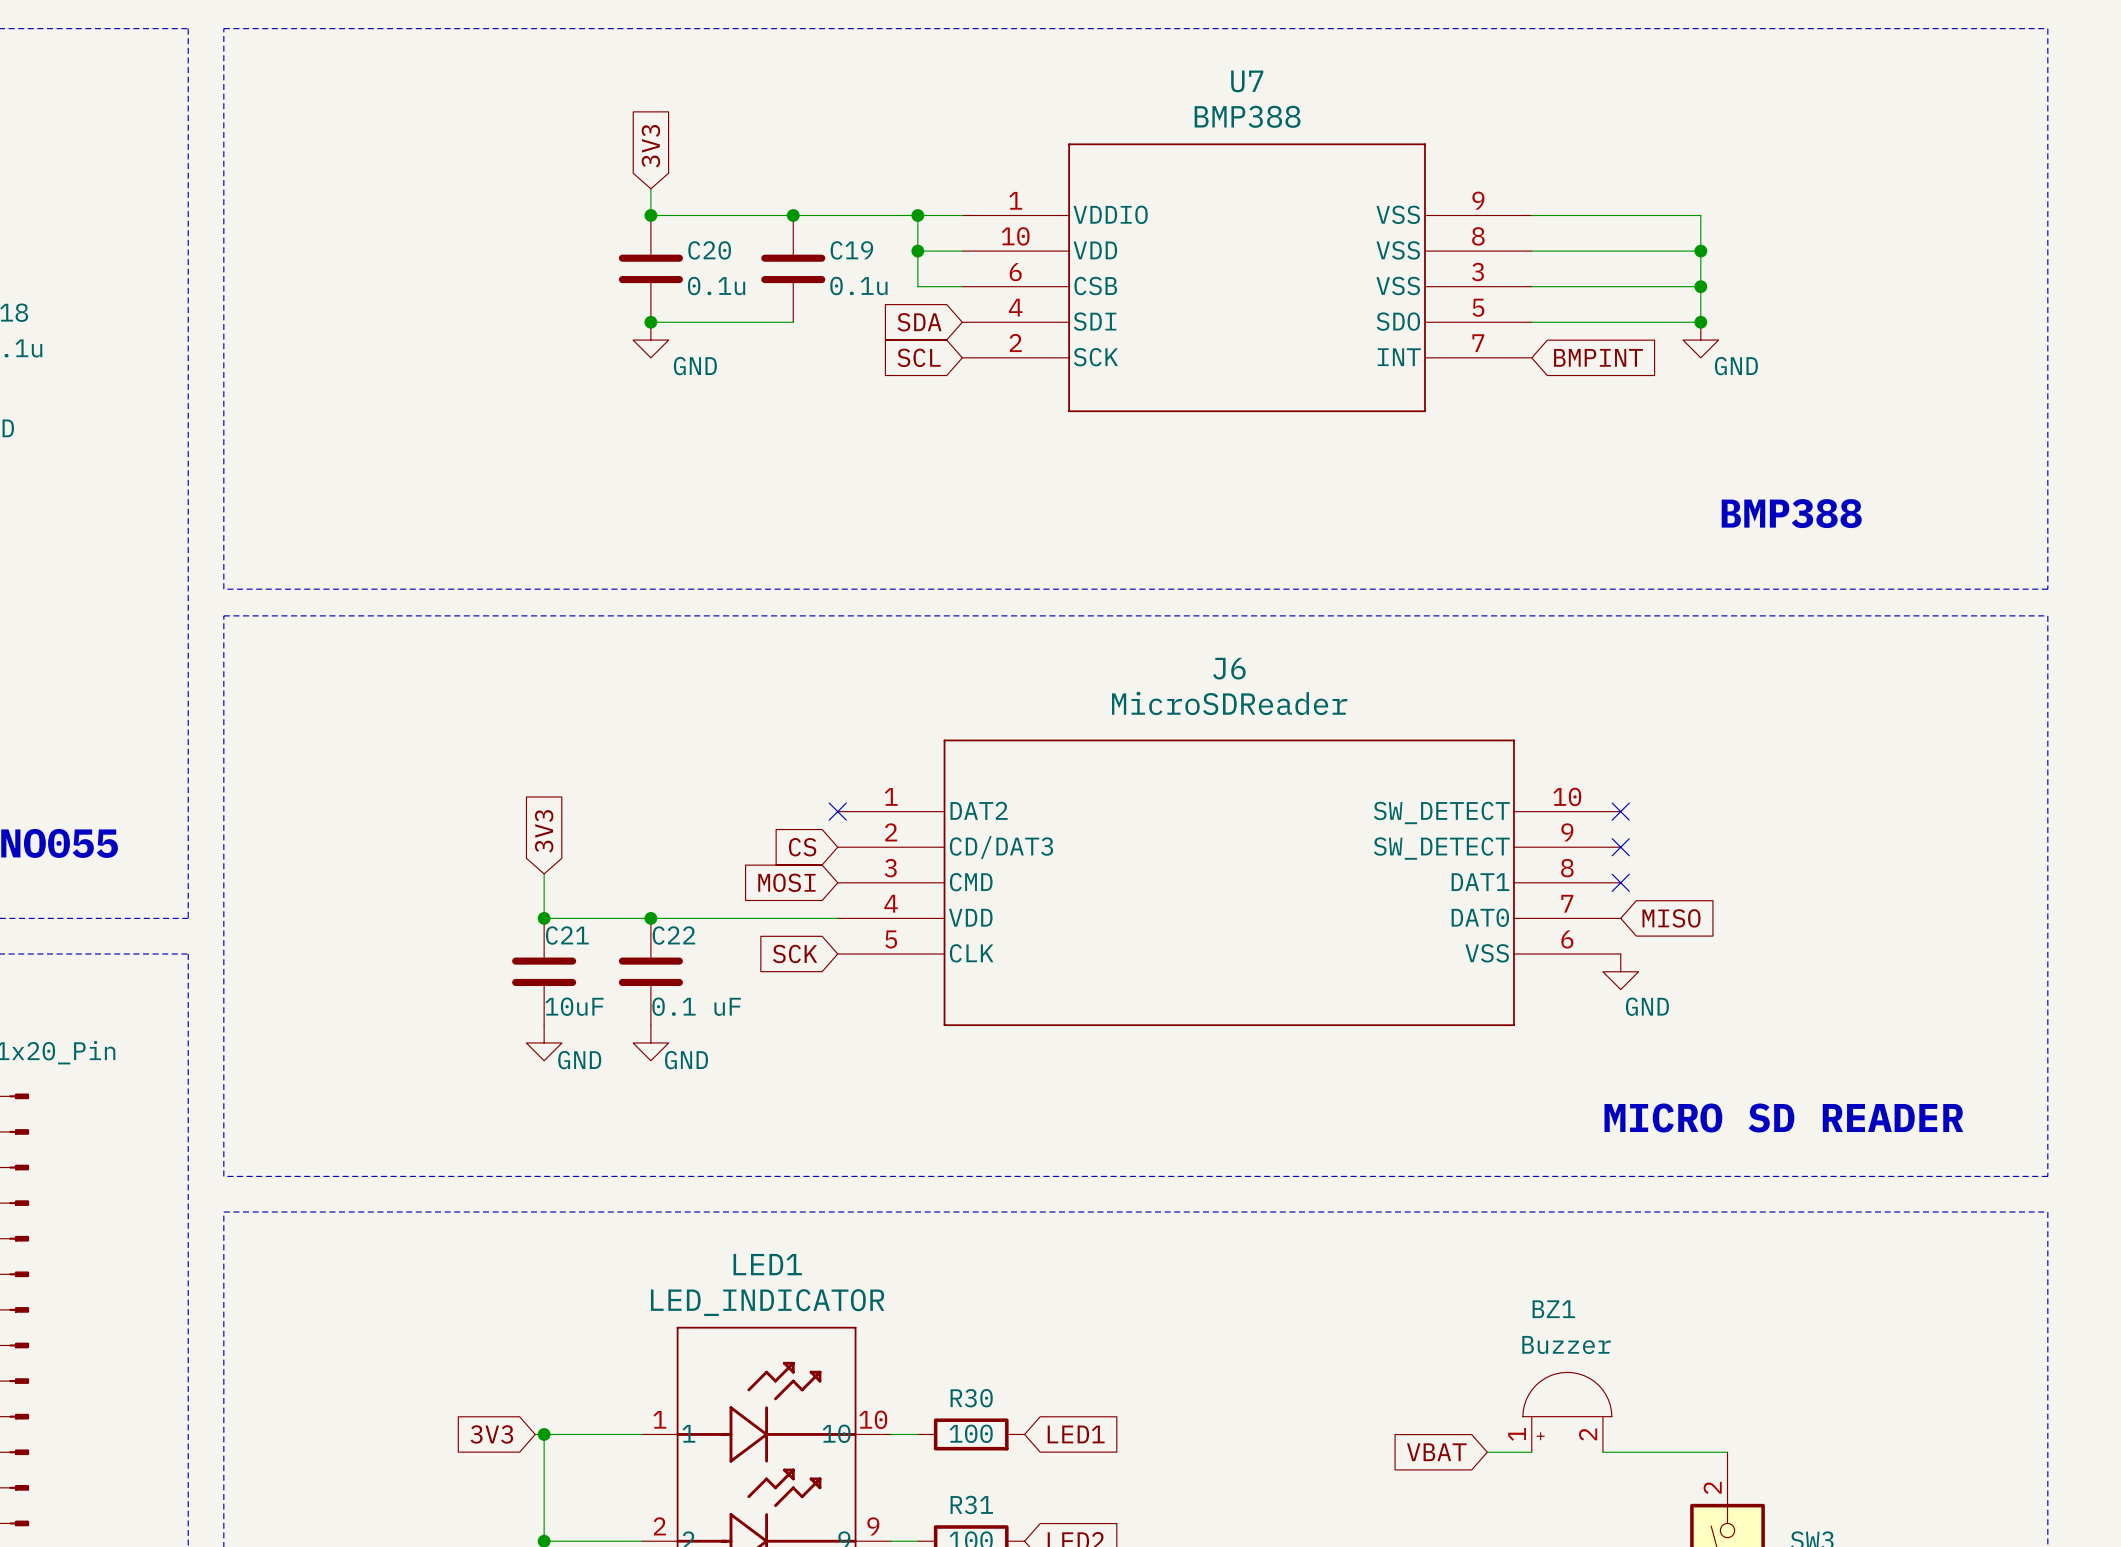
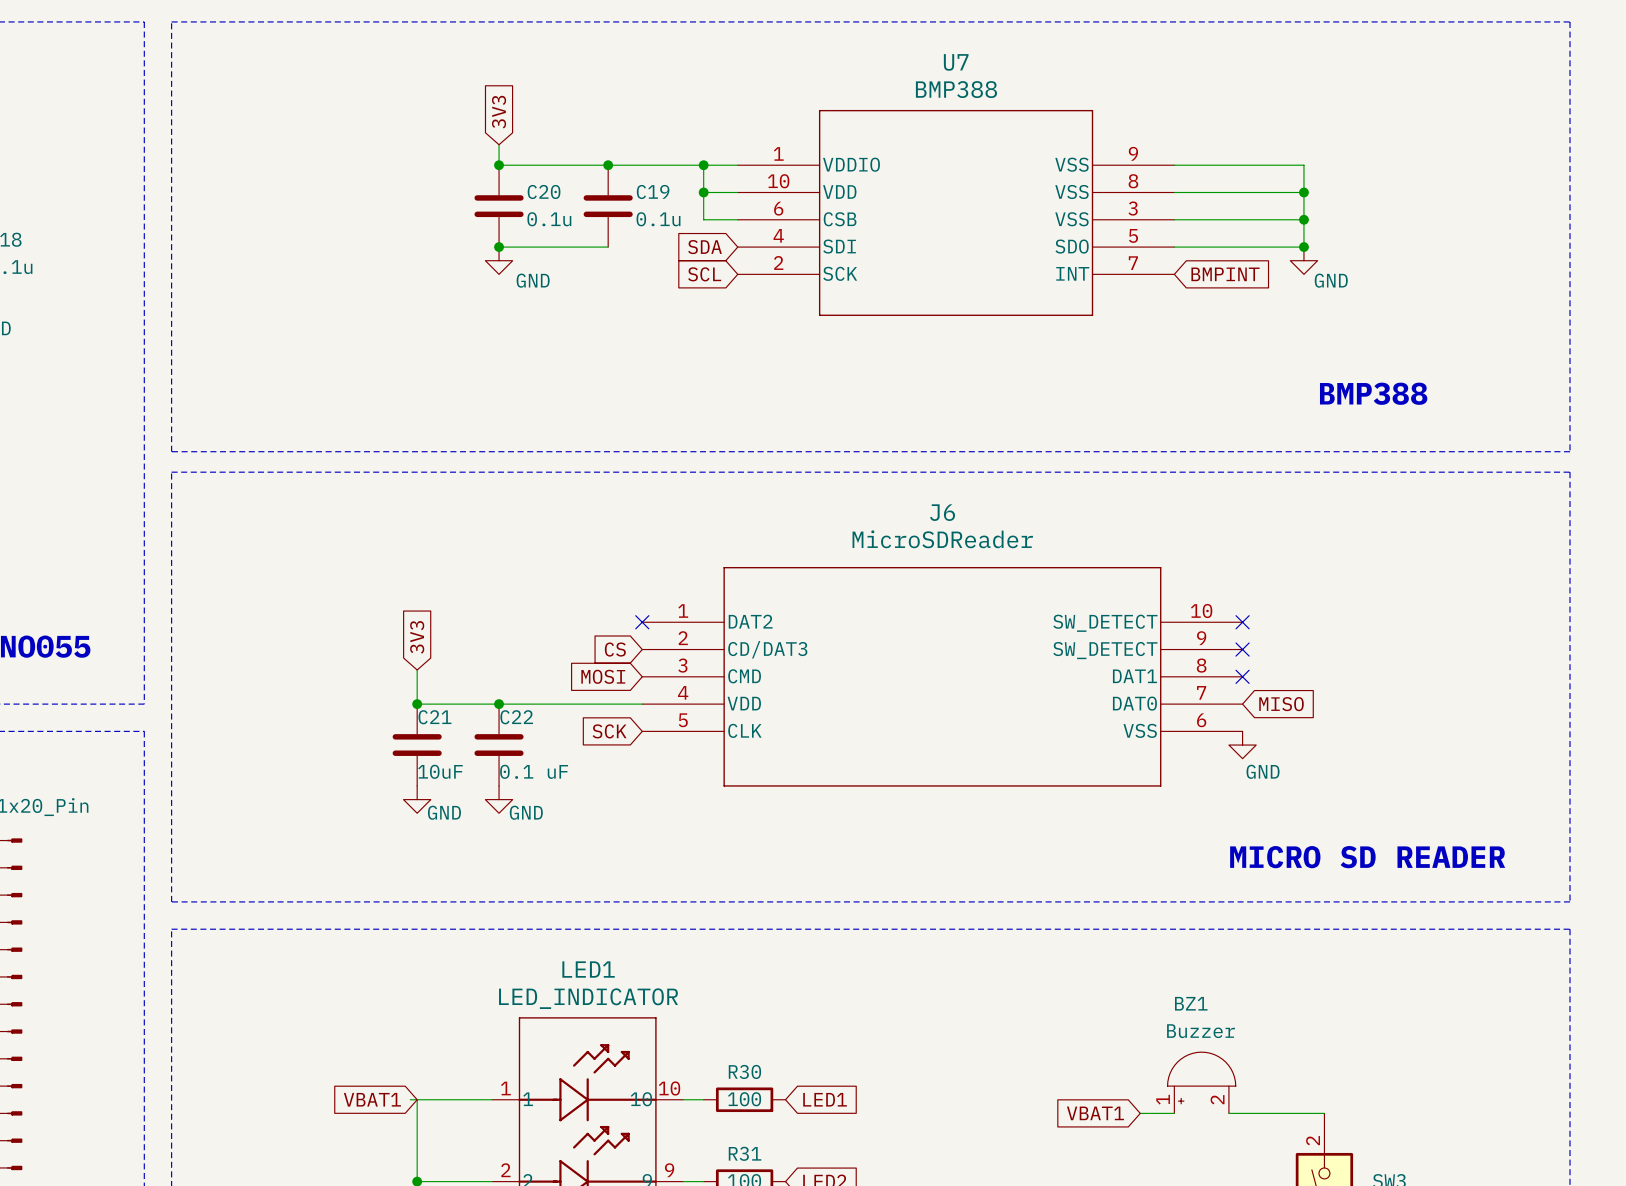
global label: 3V3 (491, 1434) -> VBAT1 (372, 1099)
junction: (544, 1434) -> none
global label: VBAT (1436, 1452) -> VBAT1 (1095, 1113)

